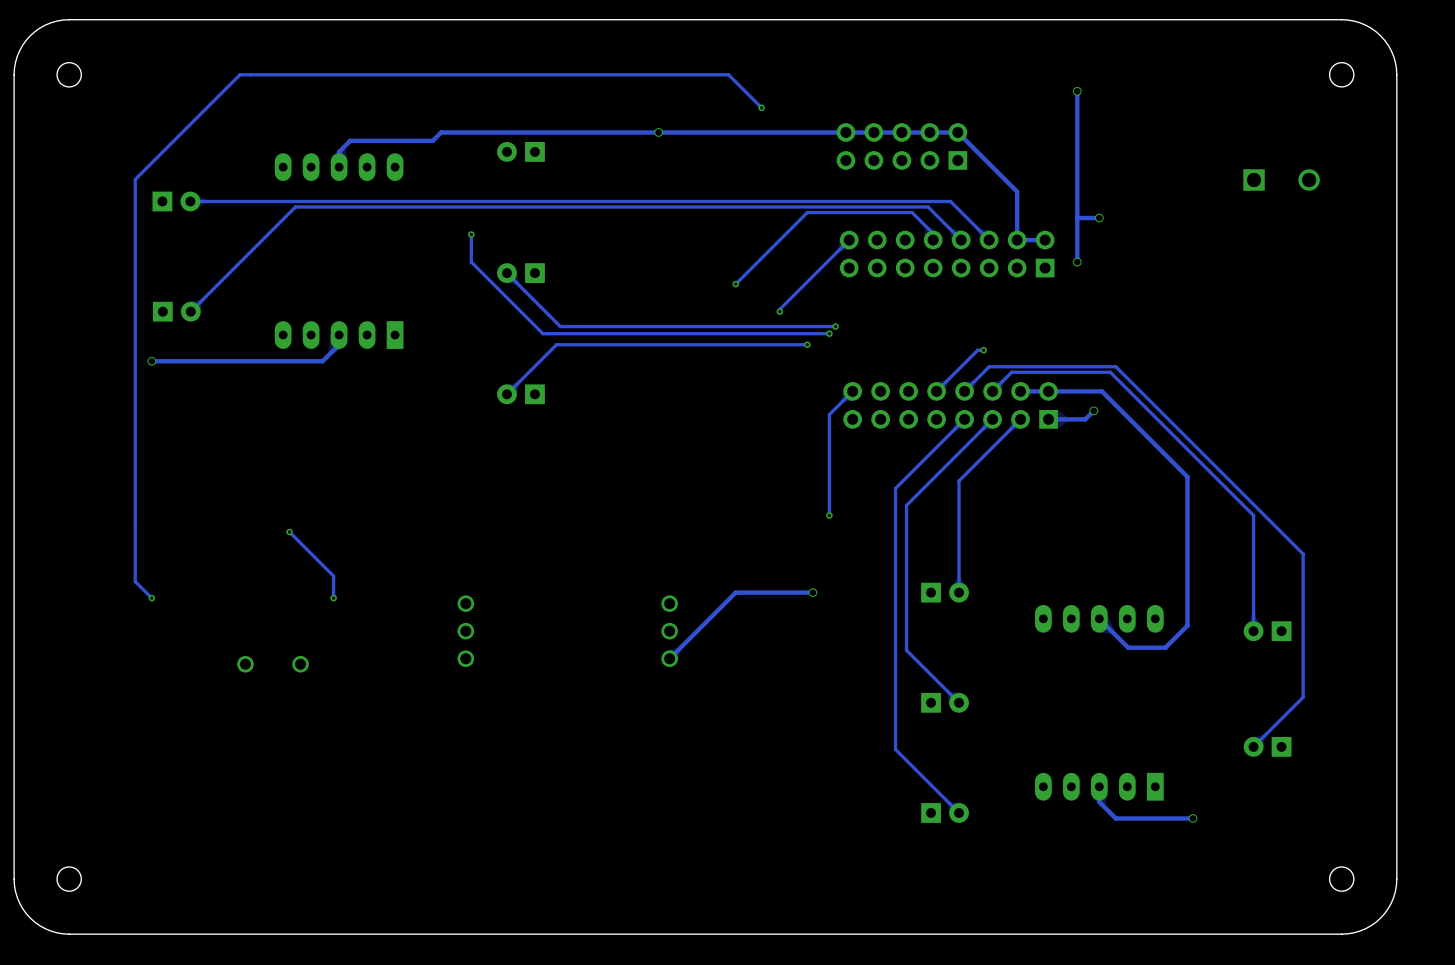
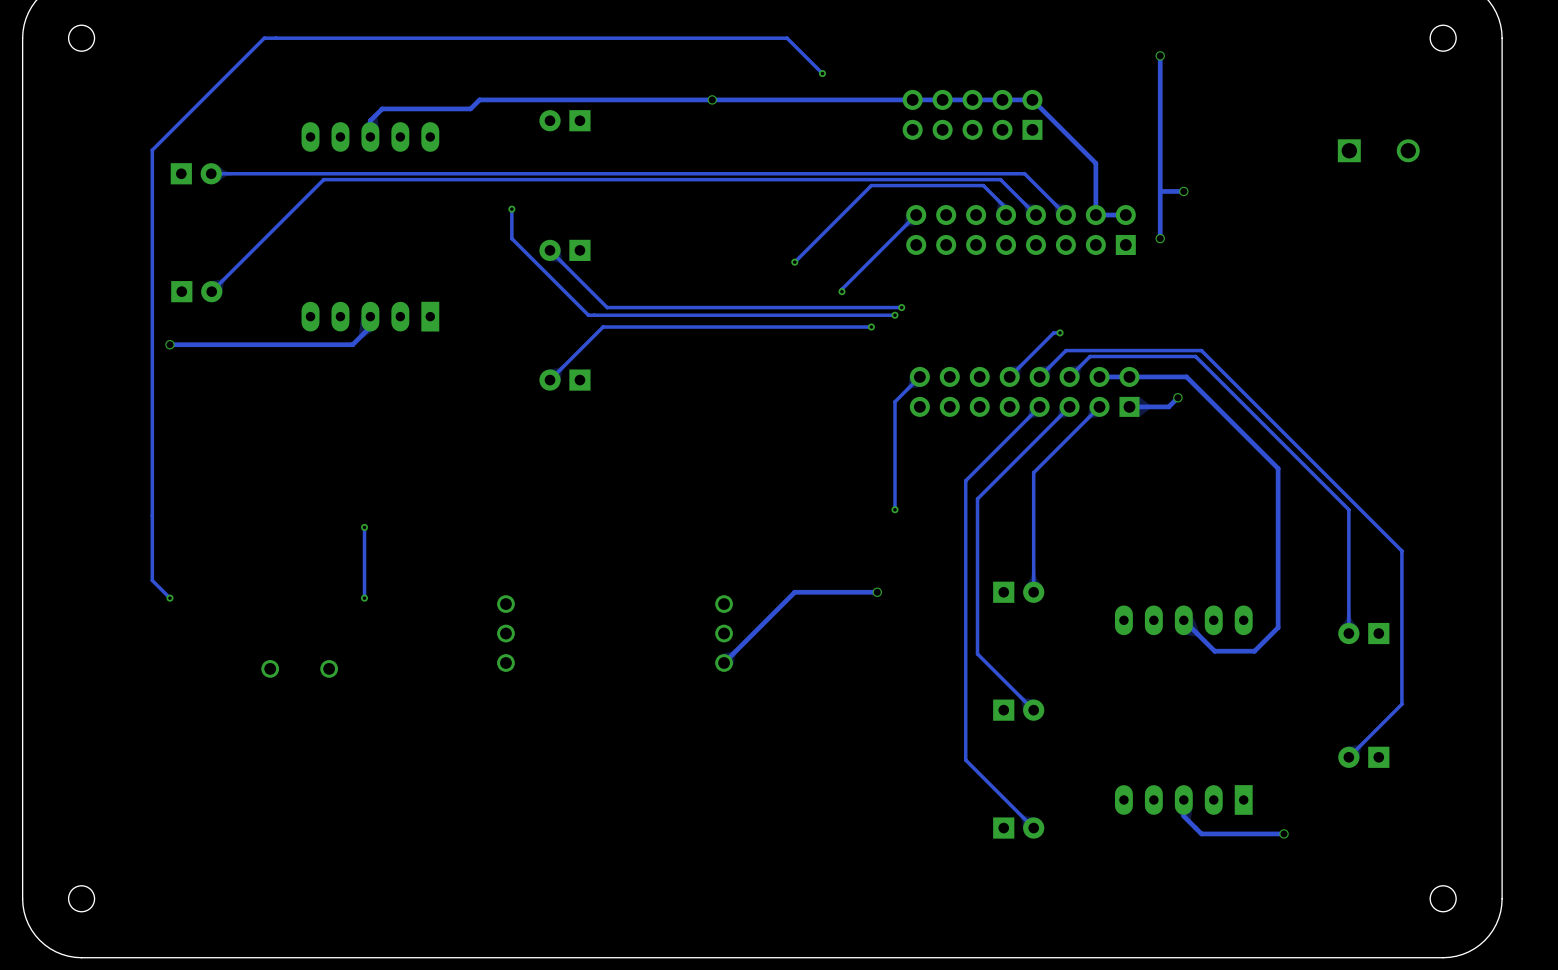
track: (289, 532) (333, 576) -> (364, 527) (364, 574)
via position: (289, 532) -> (364, 527)

